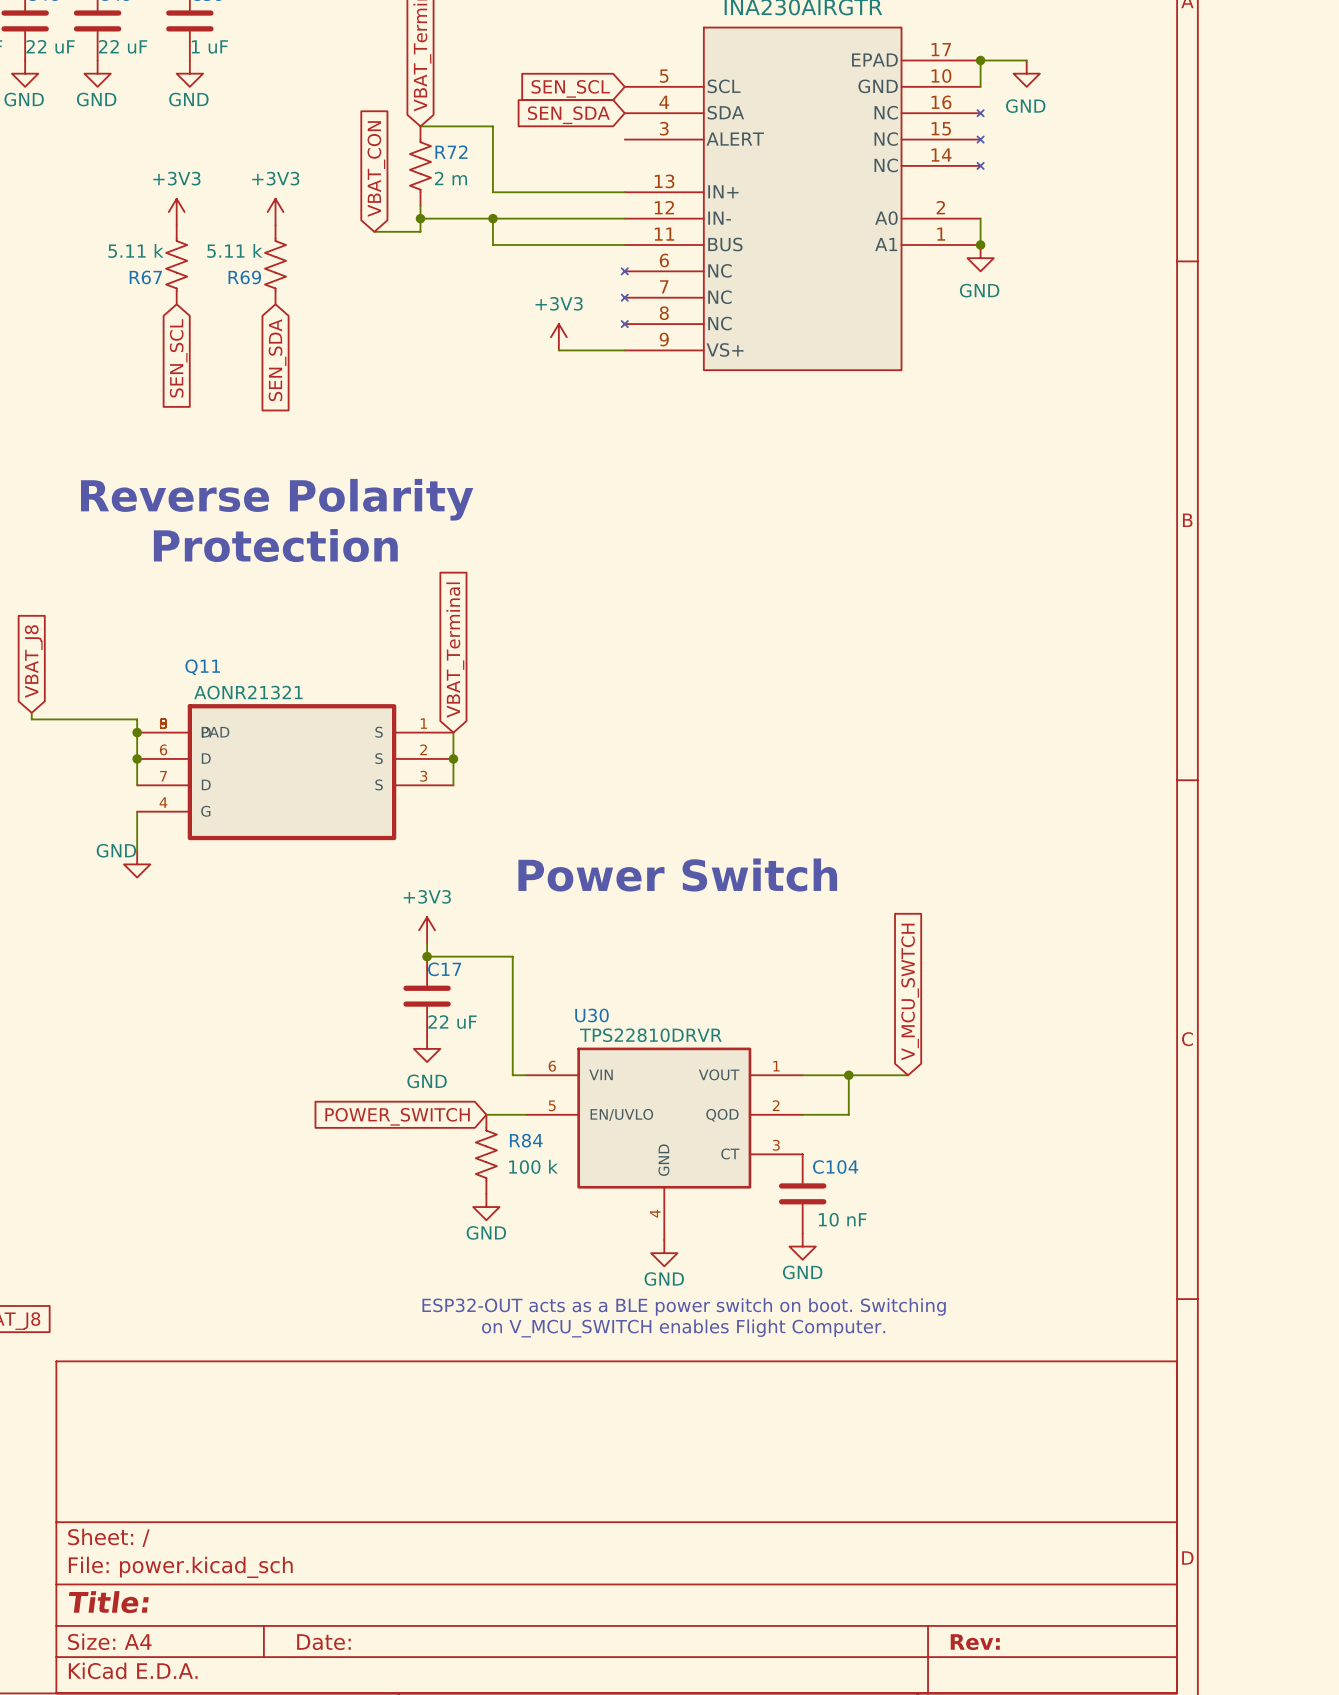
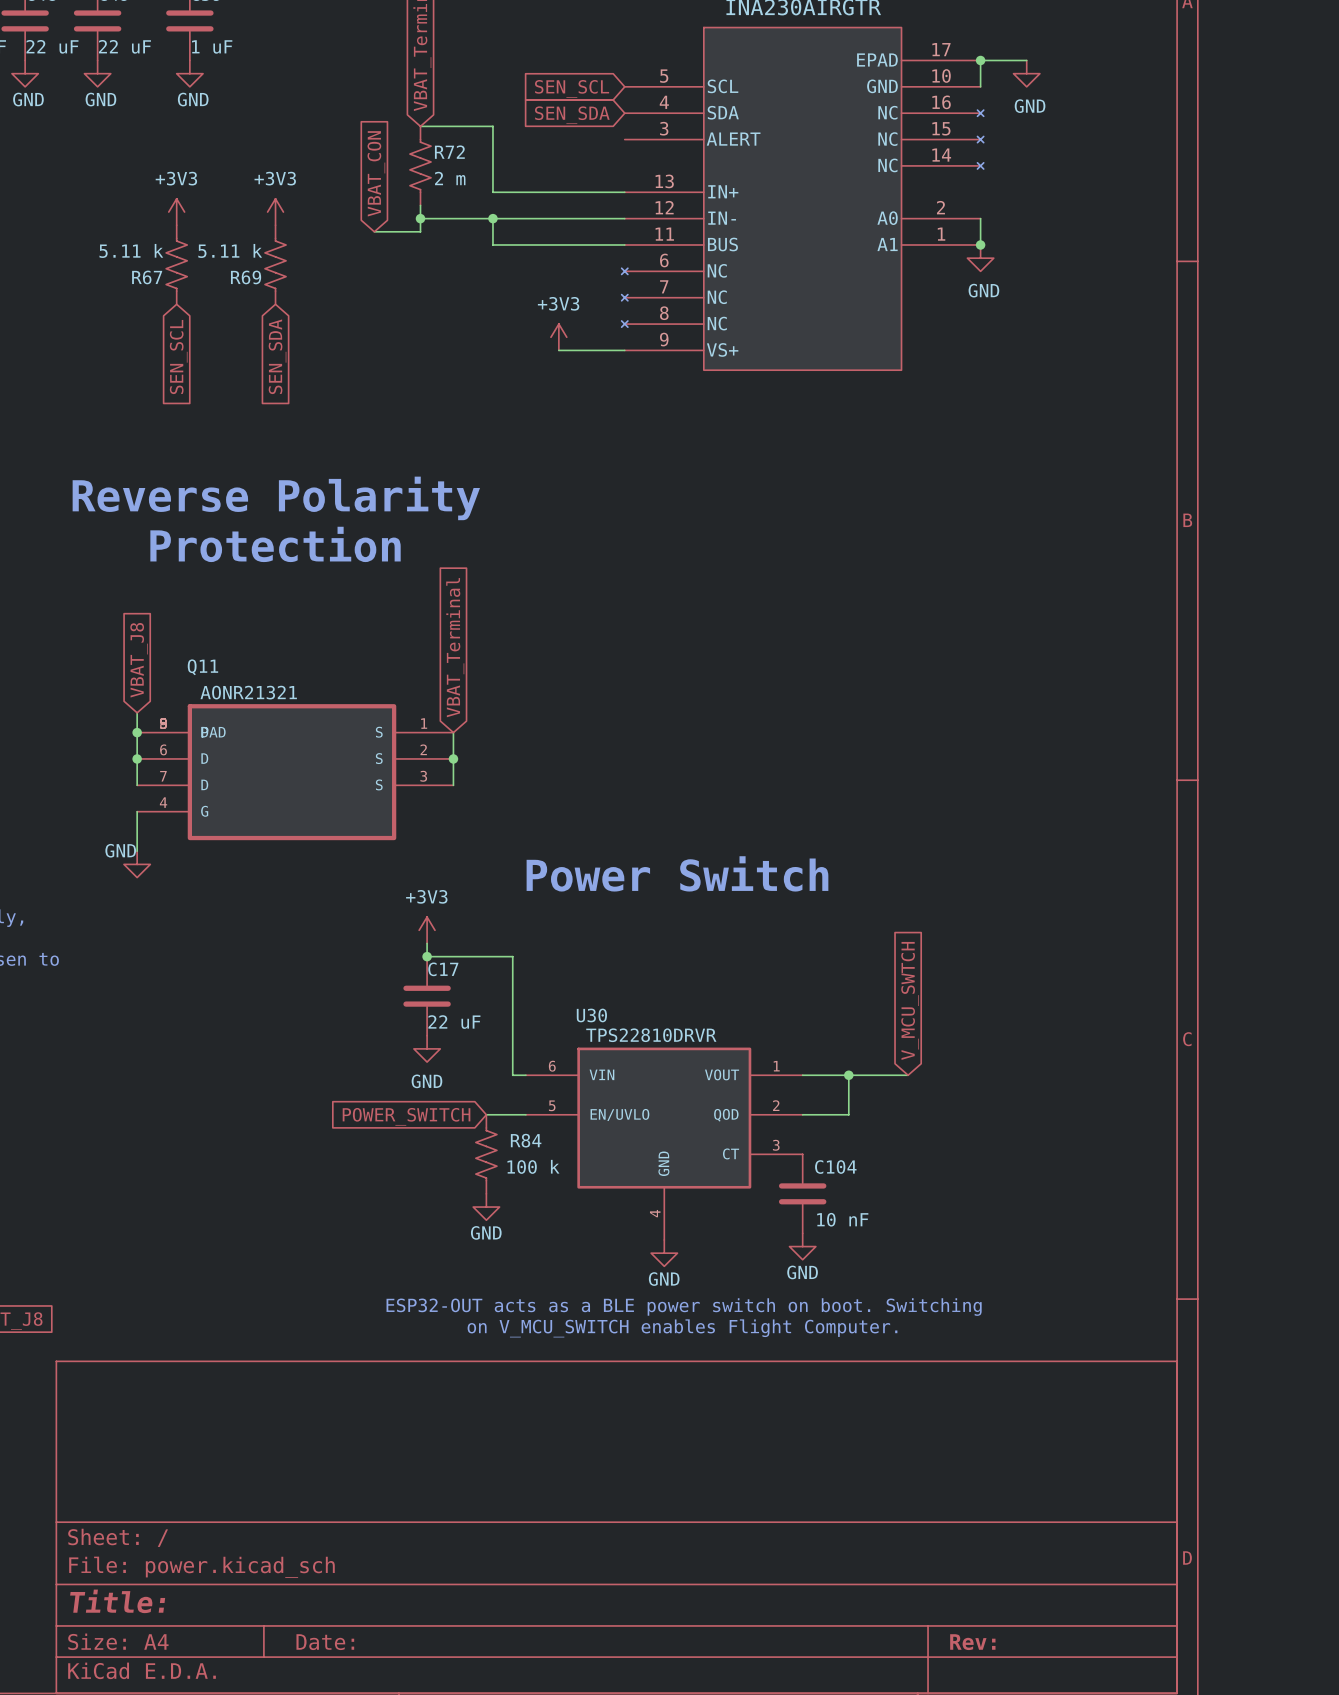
global label position: VBAT_J8 (33, 661) -> VBAT_J8 (139, 660)
wire: (31, 712) (31, 719) (137, 719) -> (137, 712) (137, 719)

